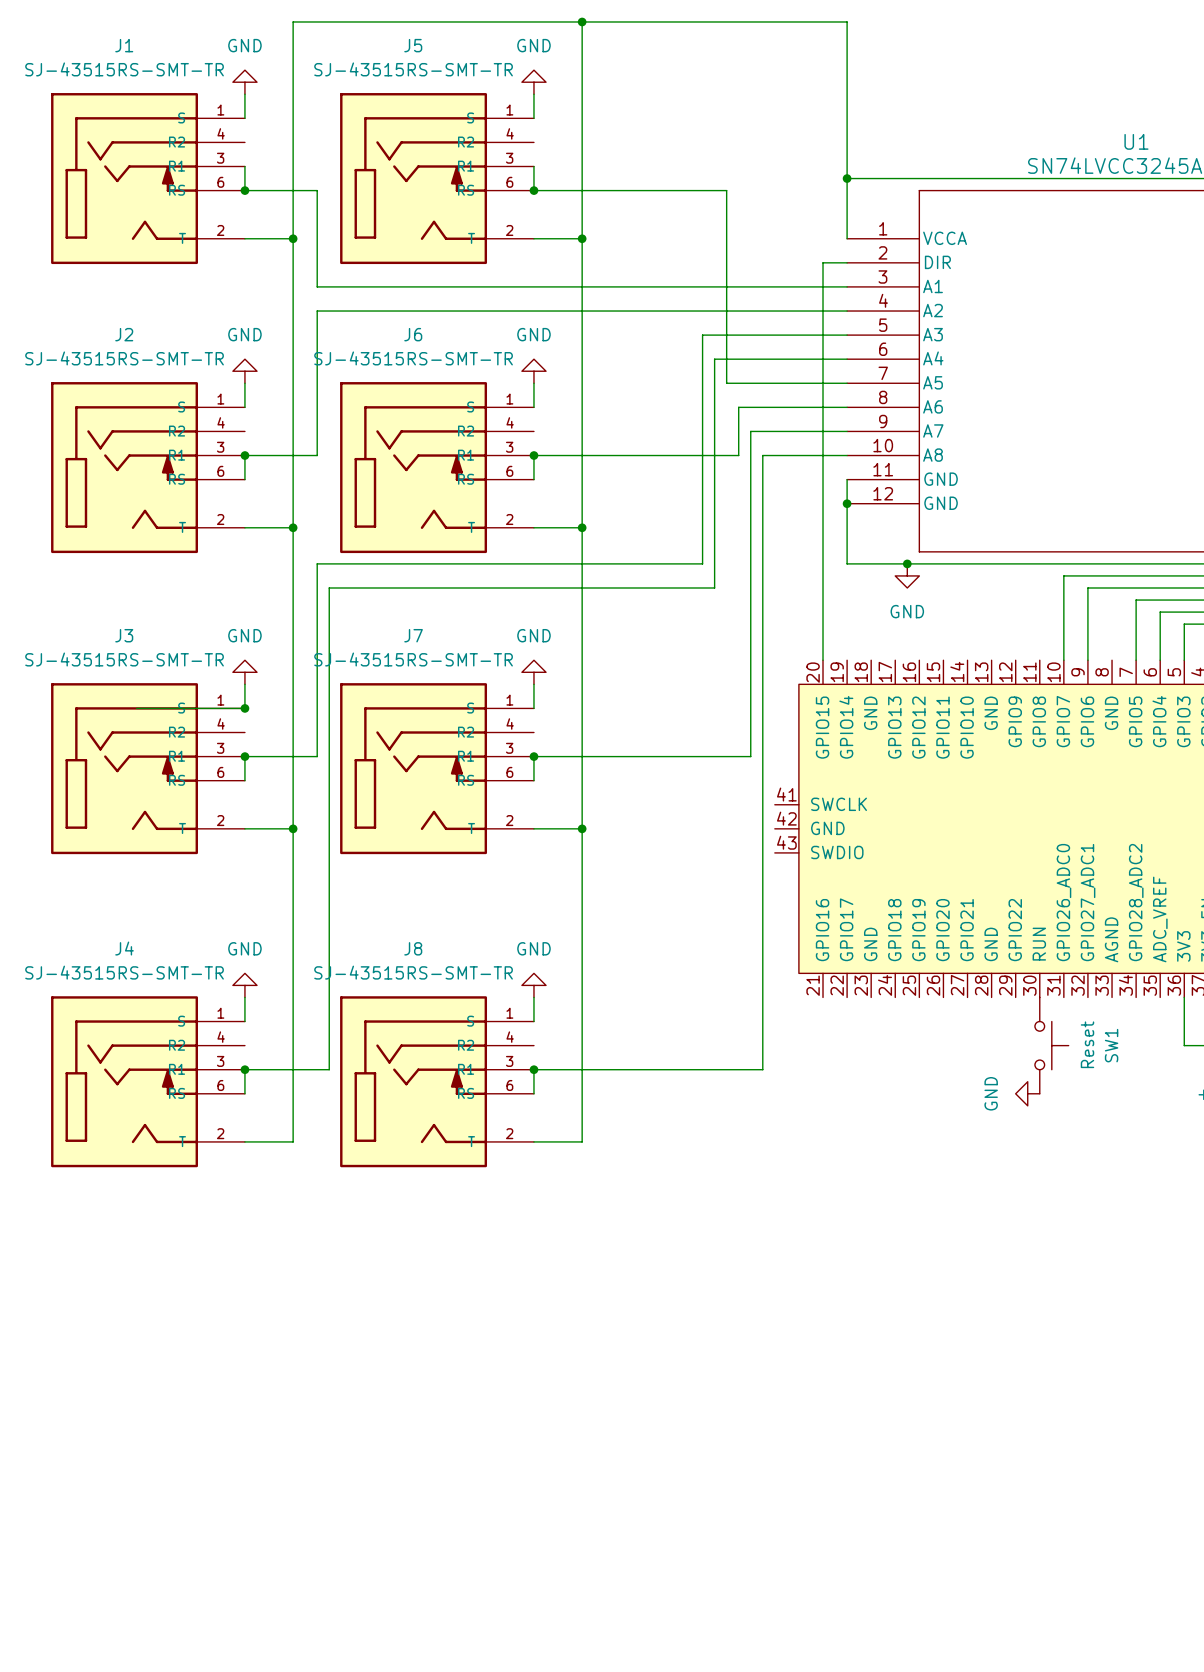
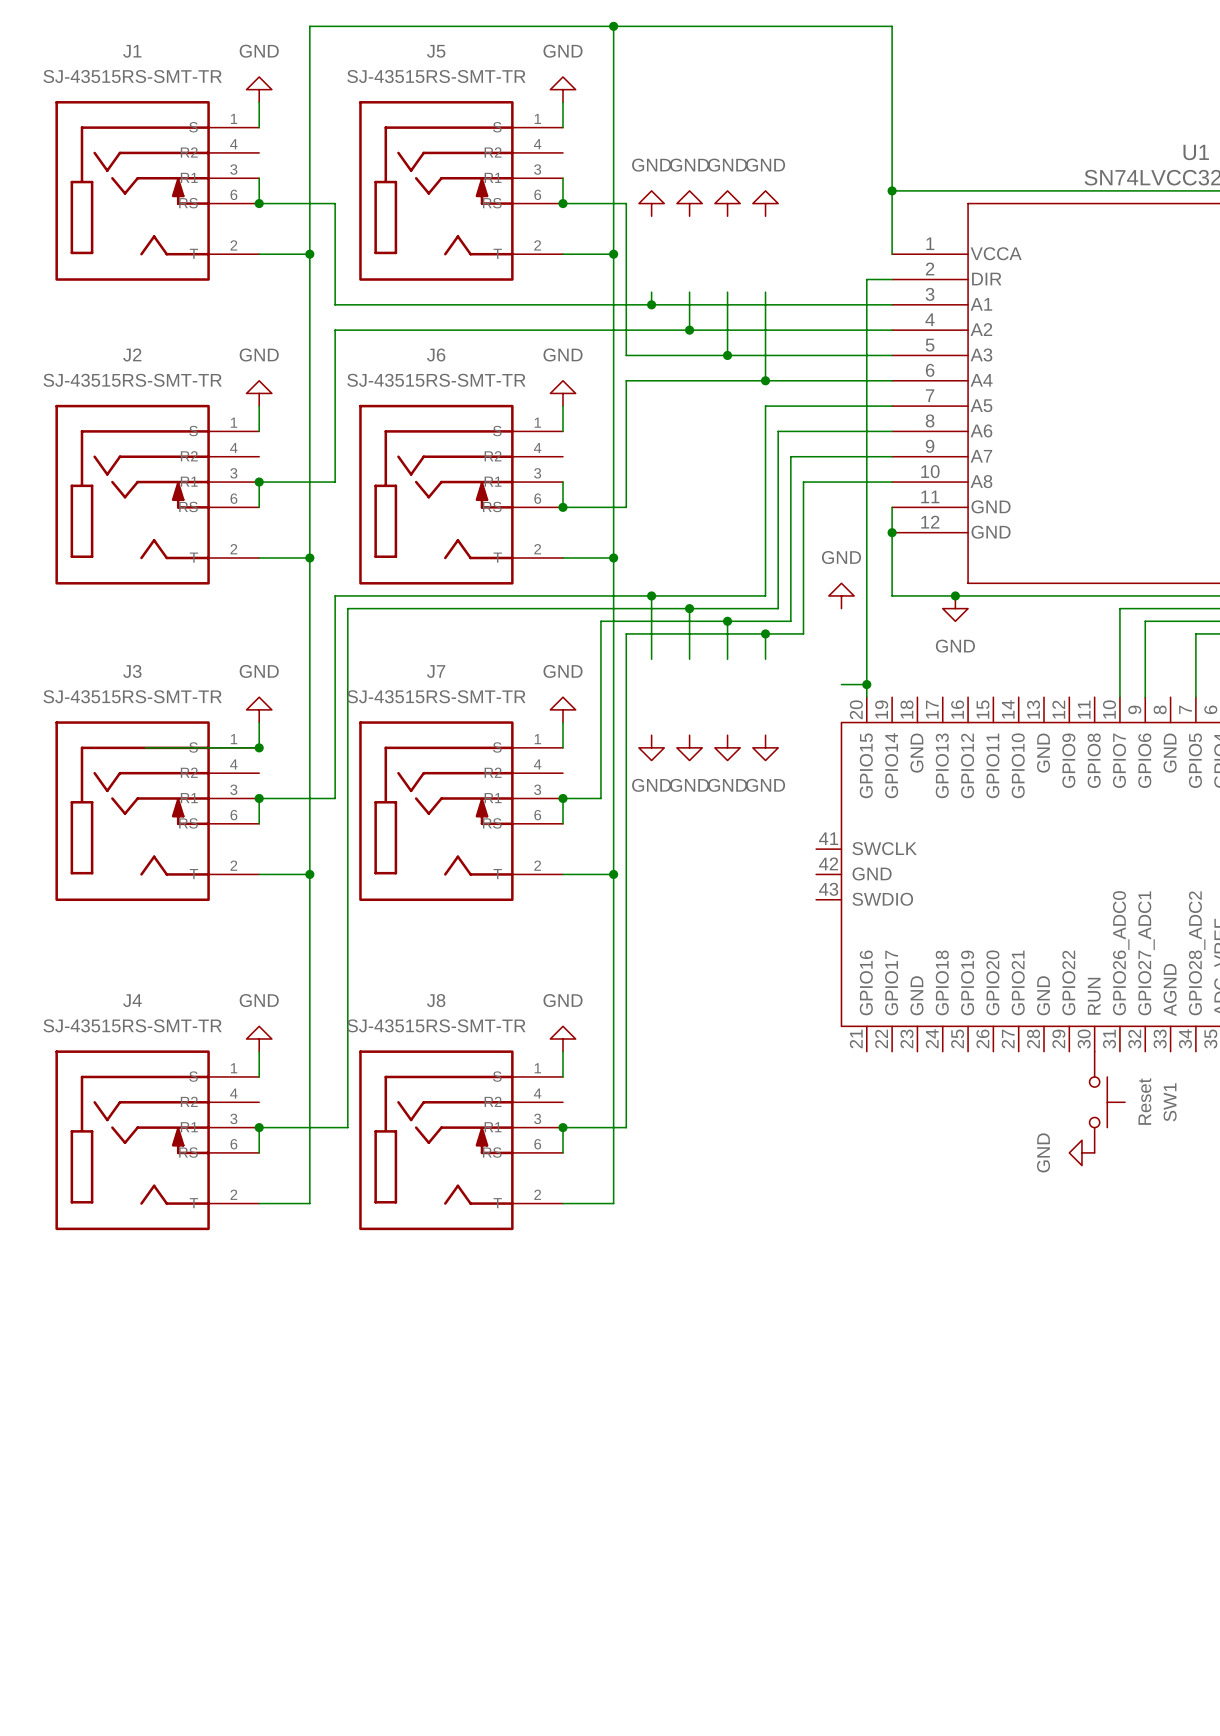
wire: (594, 190) (726, 190) (726, 274) -> (626, 203) (626, 355) (740, 355)
power symbol: none -> GND (651, 203)
power symbol: none -> GND (689, 203)
power symbol: none -> GND (727, 203)
power symbol: none -> GND (765, 203)
wire: none -> (651, 292) (651, 304)
wire: none -> (689, 292) (689, 330)
wire: none -> (727, 292) (727, 355)
junction: none -> (651, 304)
junction: none -> (689, 330)
junction: none -> (727, 355)
wire: (702, 335) (702, 563) -> (765, 406) (765, 595) (740, 595)
wire: (714, 359) (714, 587) -> (752, 380) (626, 380) (626, 507) (562, 507)
wire: (726, 359) (726, 383) -> none
junction: none -> (765, 380)
wire: (533, 455) (738, 455) -> none
junction position: (533, 455) -> (562, 507)
wire: none -> (651, 595) (651, 659)
junction: none -> (651, 595)
power symbol: none -> GND (841, 595)
wire: none -> (689, 608) (689, 659)
junction: none -> (689, 608)
wire: (329, 587) (570, 587) -> (347, 621) (347, 608) (778, 608) (778, 482)
wire: none -> (727, 621) (727, 659)
junction: none -> (727, 621)
wire: none -> (752, 621) (790, 621)
wire: (750, 587) (750, 756) (570, 756) -> (600, 621) (600, 798)
wire: none -> (765, 633) (765, 659)
junction: none -> (765, 633)
wire: (762, 600) (762, 1069) (594, 1069) -> (803, 633) (626, 633) (626, 1127)
wire: none -> (841, 684) (866, 684)
junction: none -> (866, 684)
power symbol: none -> GND (651, 747)
power symbol: none -> GND (689, 747)
power symbol: none -> GND (727, 747)
power symbol: none -> GND (765, 747)

